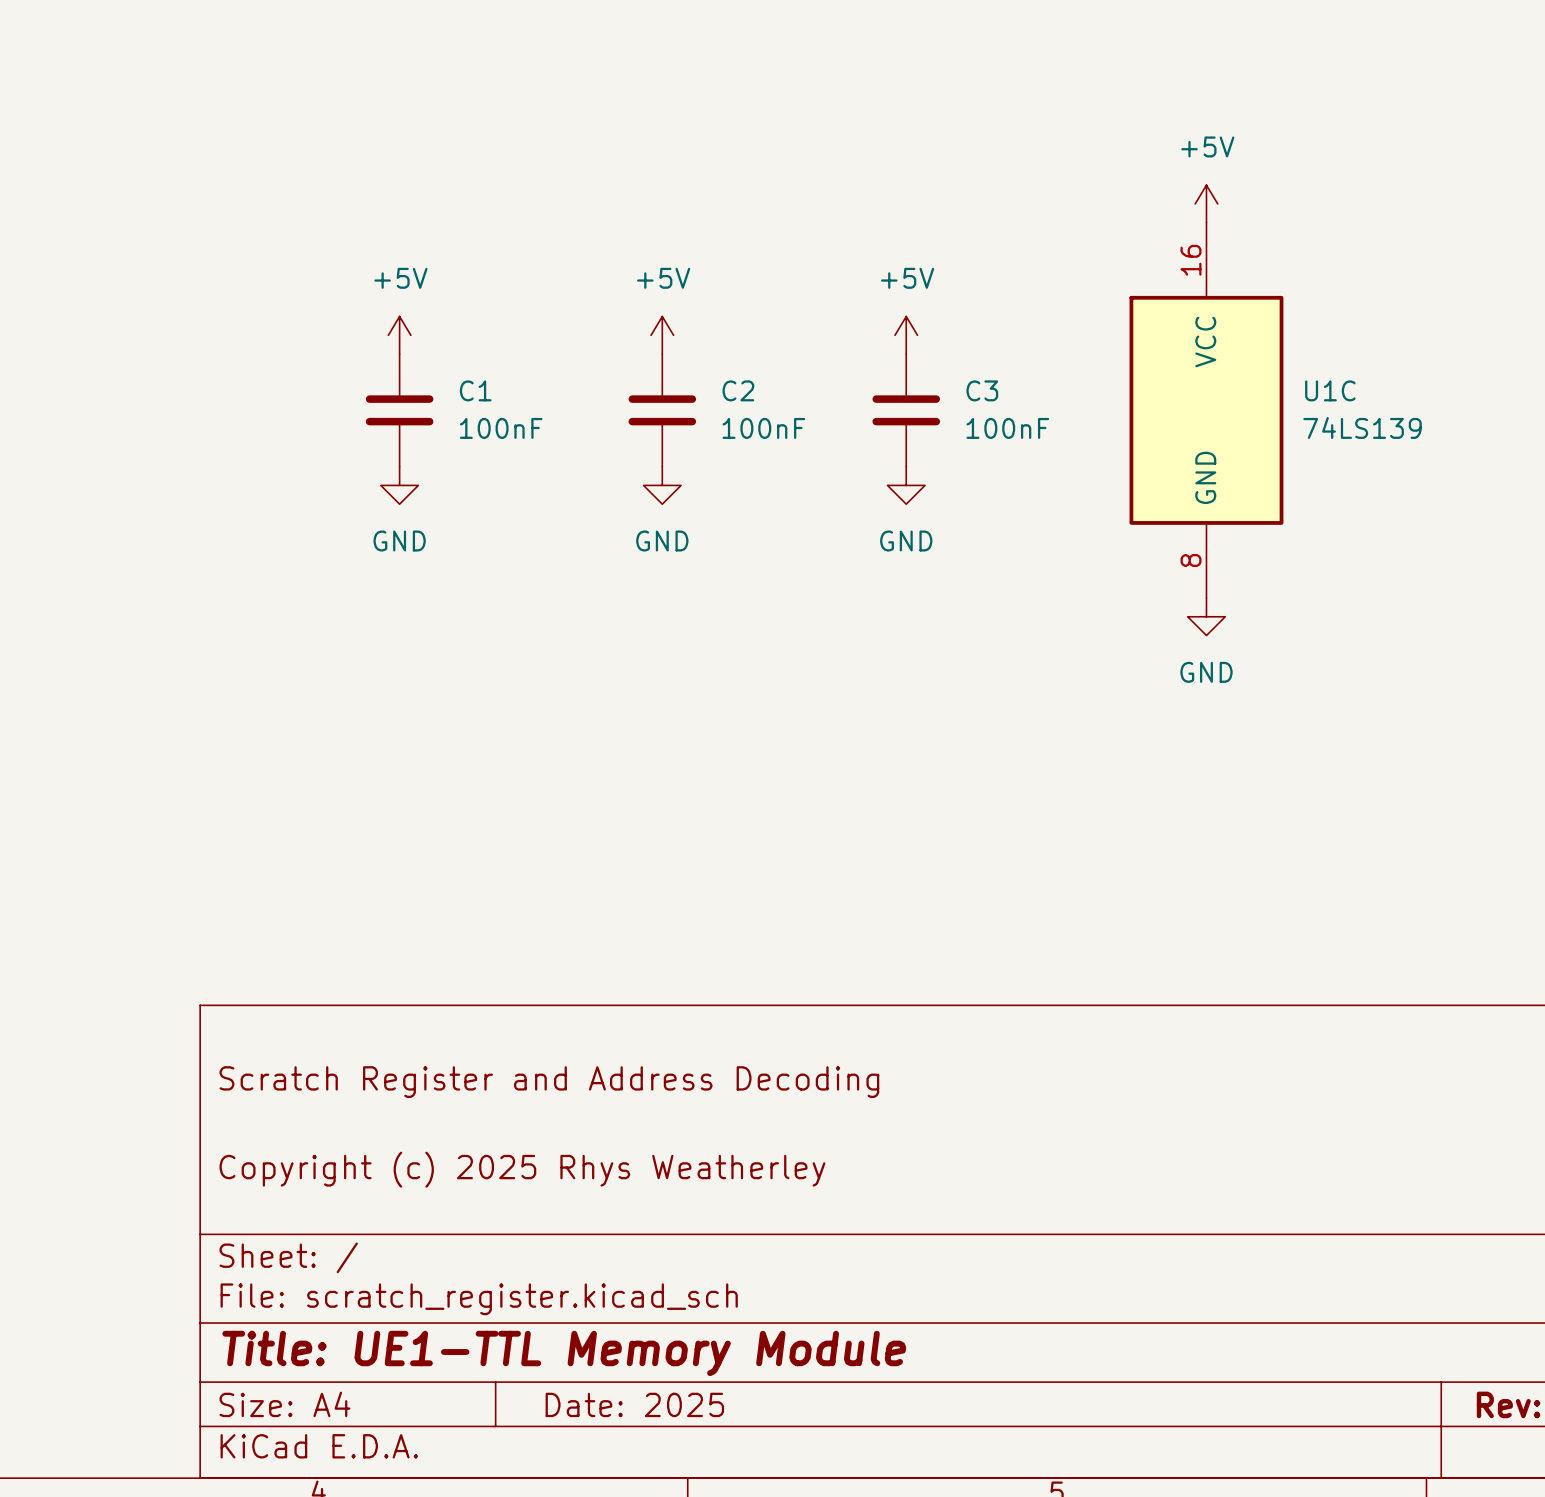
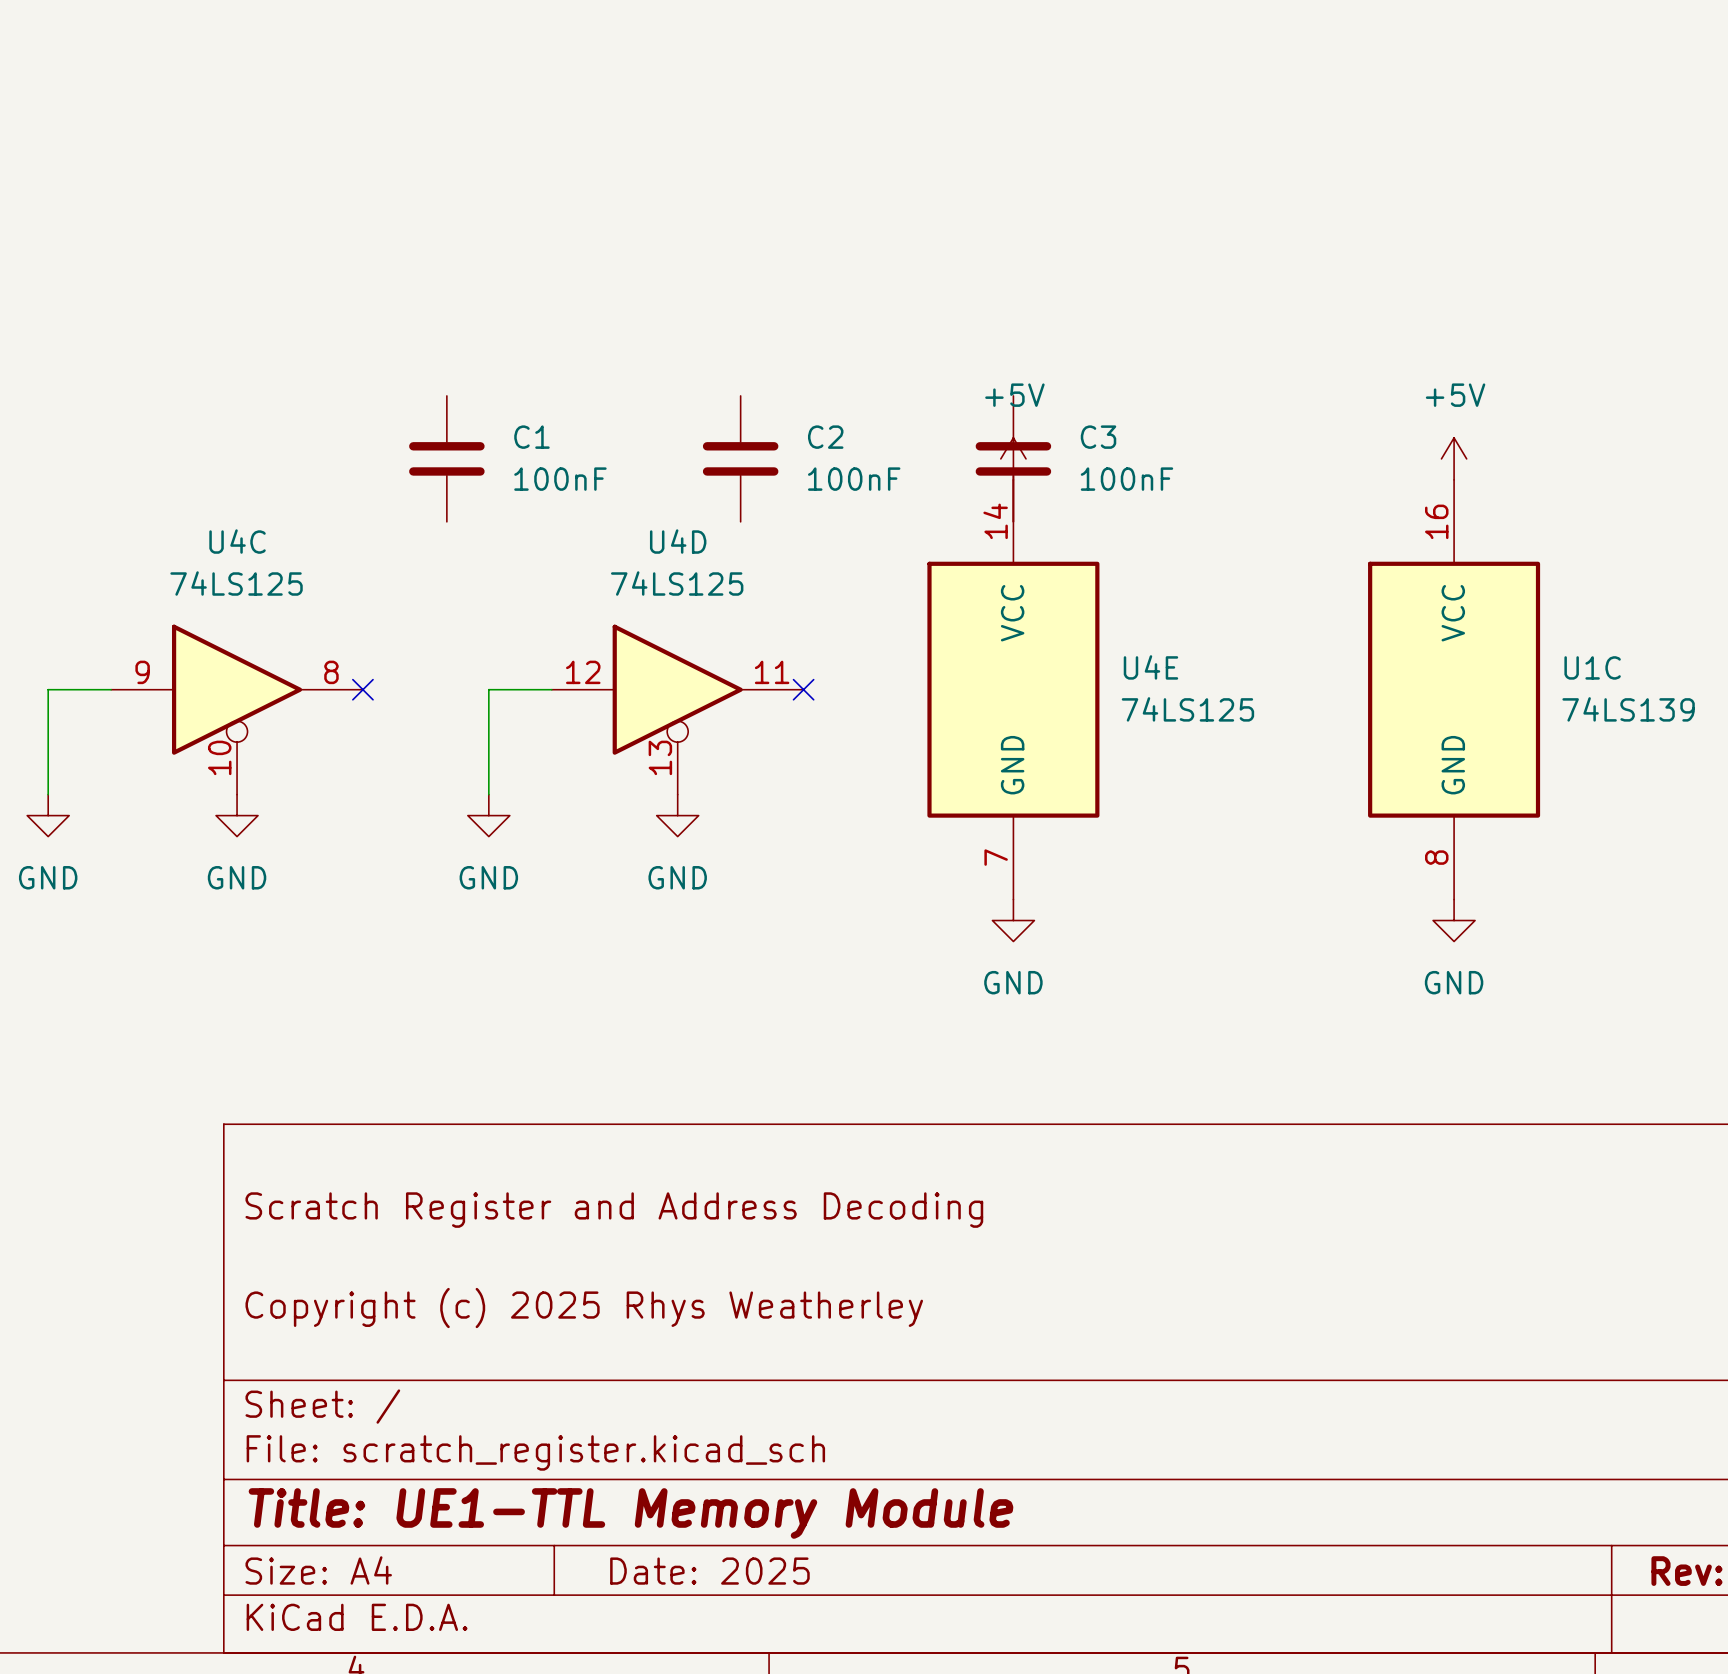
power symbol: +5V (1206, 203) -> none
power symbol: +5V (399, 335) -> none
power symbol: +5V (662, 335) -> none
power symbol position: +5V (906, 335) -> +5V (1013, 458)
U1C position: (1206, 410) -> (1454, 689)
power symbol: none -> +5V (1454, 458)
power symbol: GND (399, 485) -> none
power symbol: GND (662, 485) -> none
power symbol: GND (906, 485) -> none
wire: none -> (111, 689) (48, 689) (48, 794)
no-connect mark: none -> (362, 689)
wire: none -> (551, 689) (488, 689) (488, 794)
no-connect mark: none -> (803, 689)
U4E: none -> 74LS125 (1013, 689)
power symbol: GND (1206, 616) -> none
U4C: none -> 74LS125 (237, 709)
U4D: none -> 74LS125 (677, 709)
power symbol: none -> GND (48, 815)
power symbol: none -> GND (237, 815)
power symbol: none -> GND (488, 815)
power symbol: none -> GND (677, 815)
power symbol: none -> GND (1013, 920)
power symbol: none -> GND (1454, 920)

